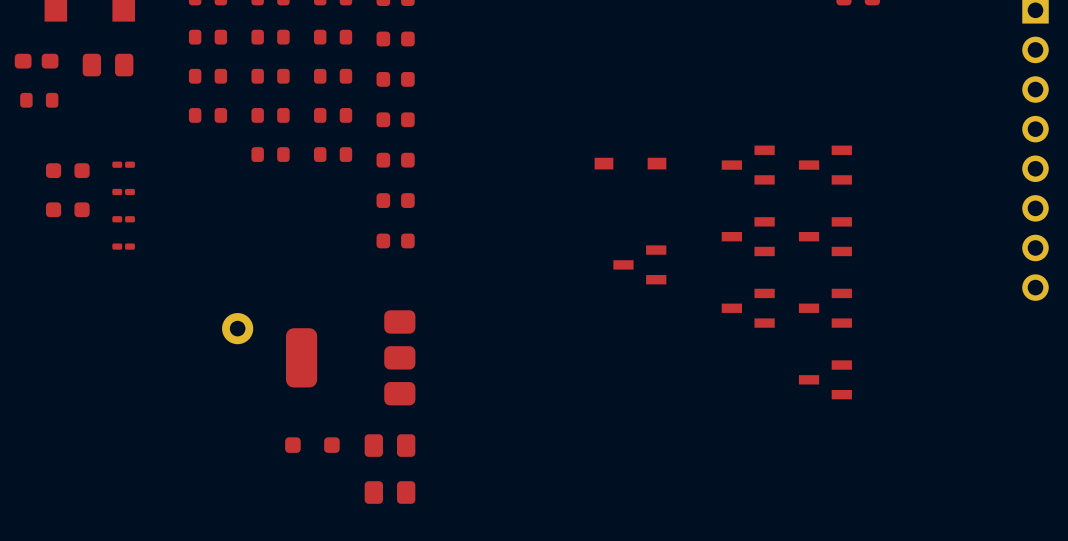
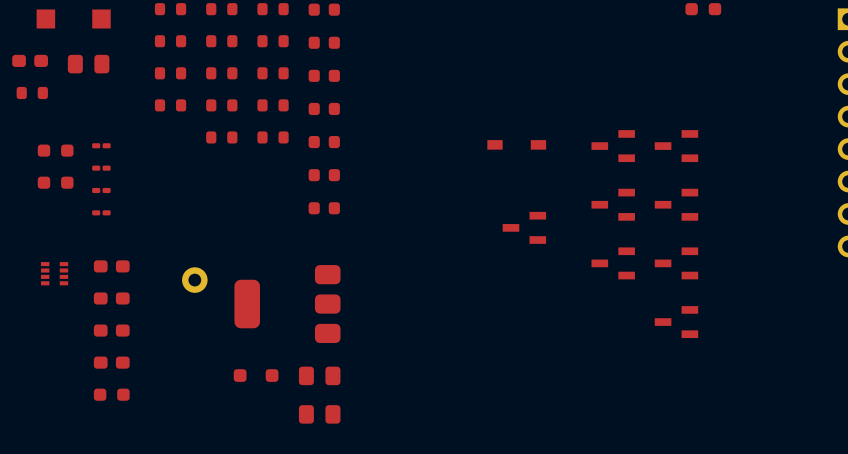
part: none -> (111, 266)
part: none -> (54, 273)
part: none -> (111, 298)
part: none -> (111, 330)
part: none -> (111, 362)
part: none -> (111, 394)

